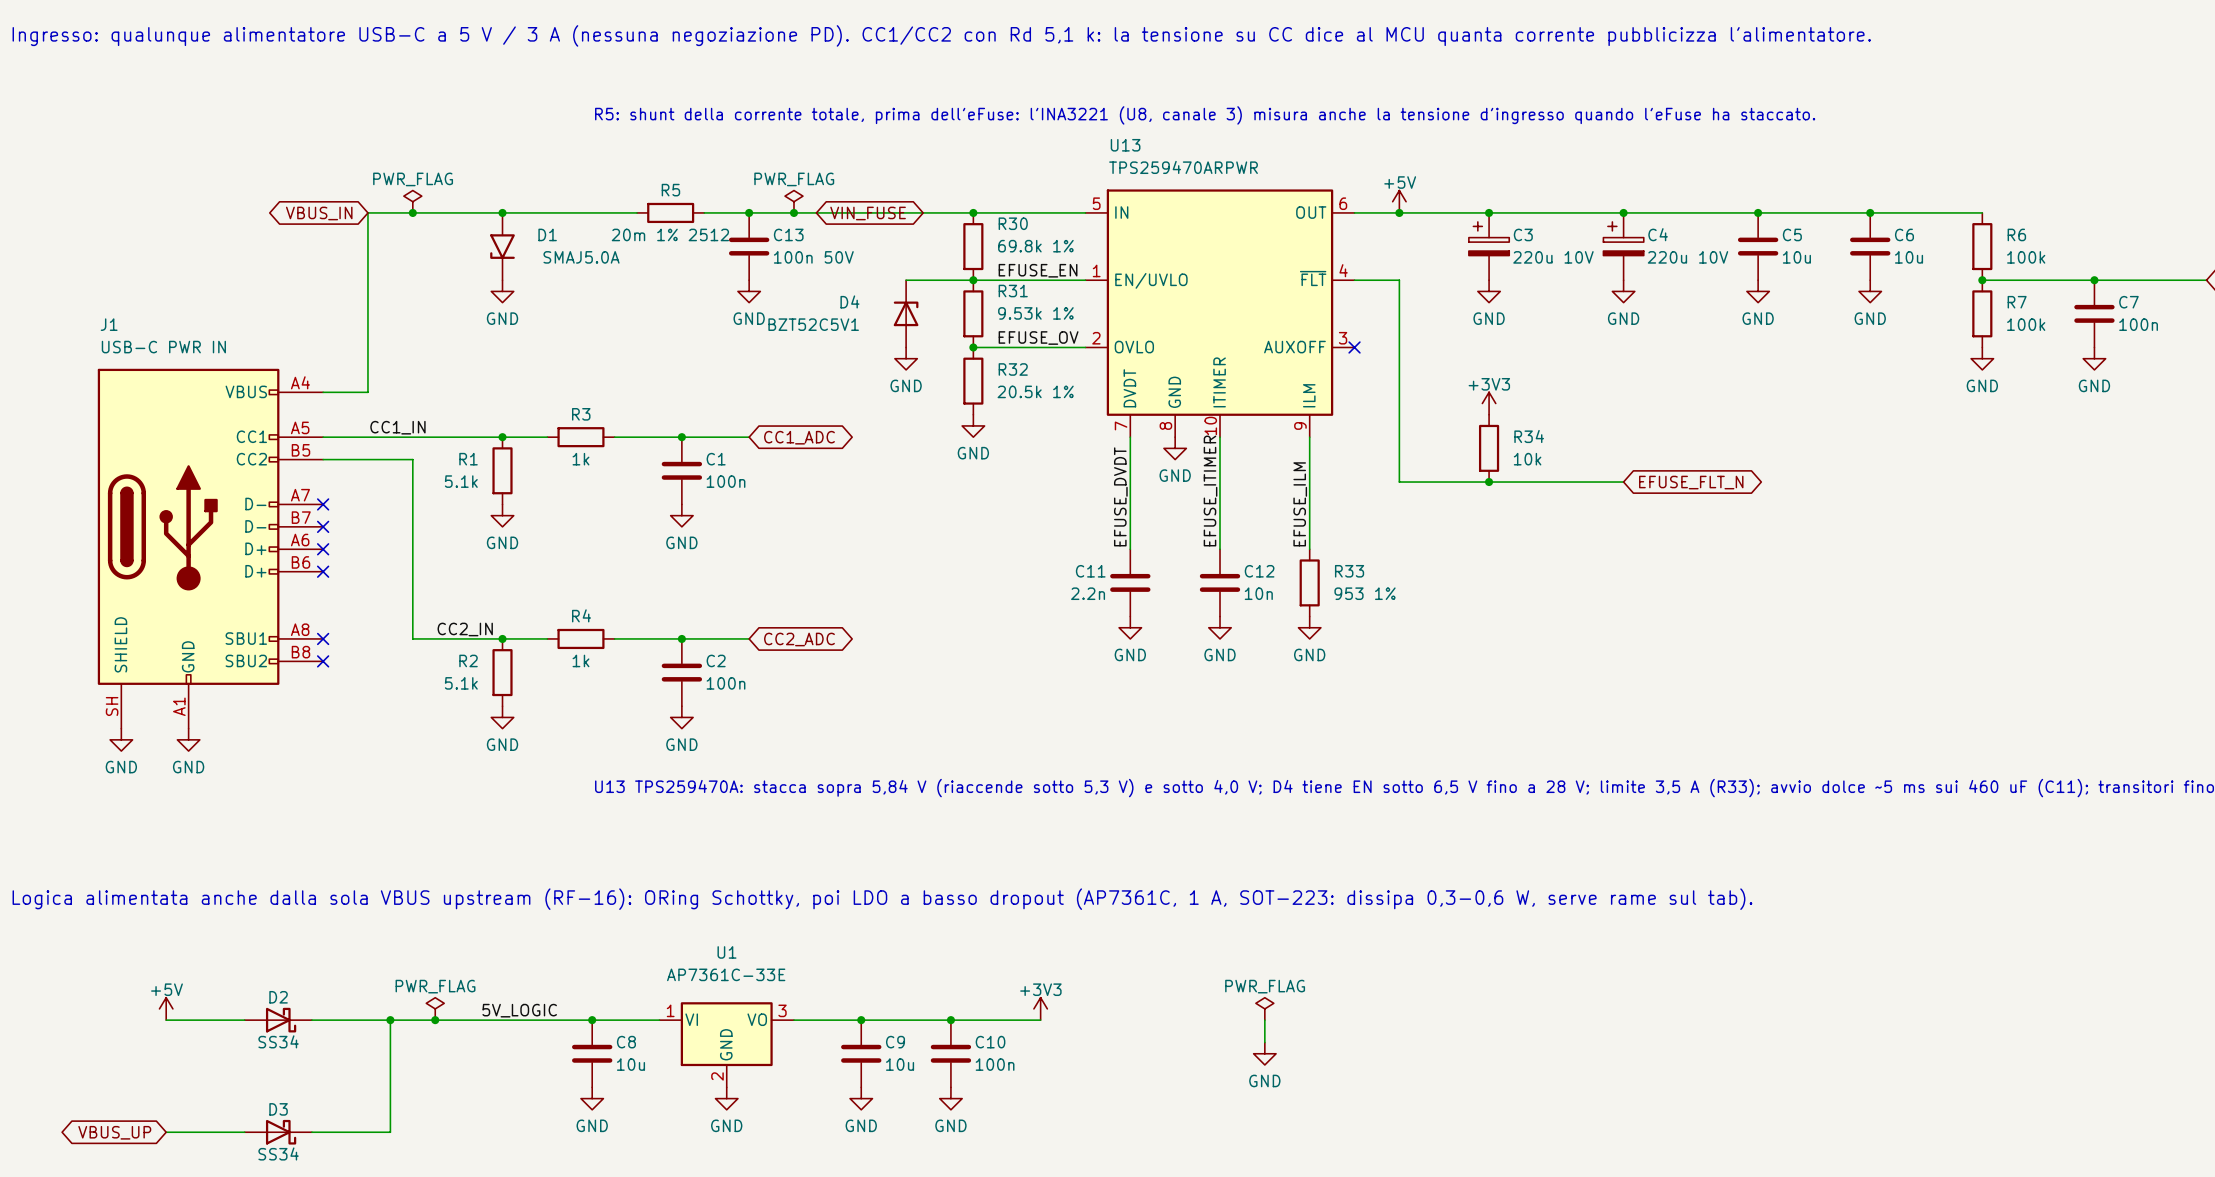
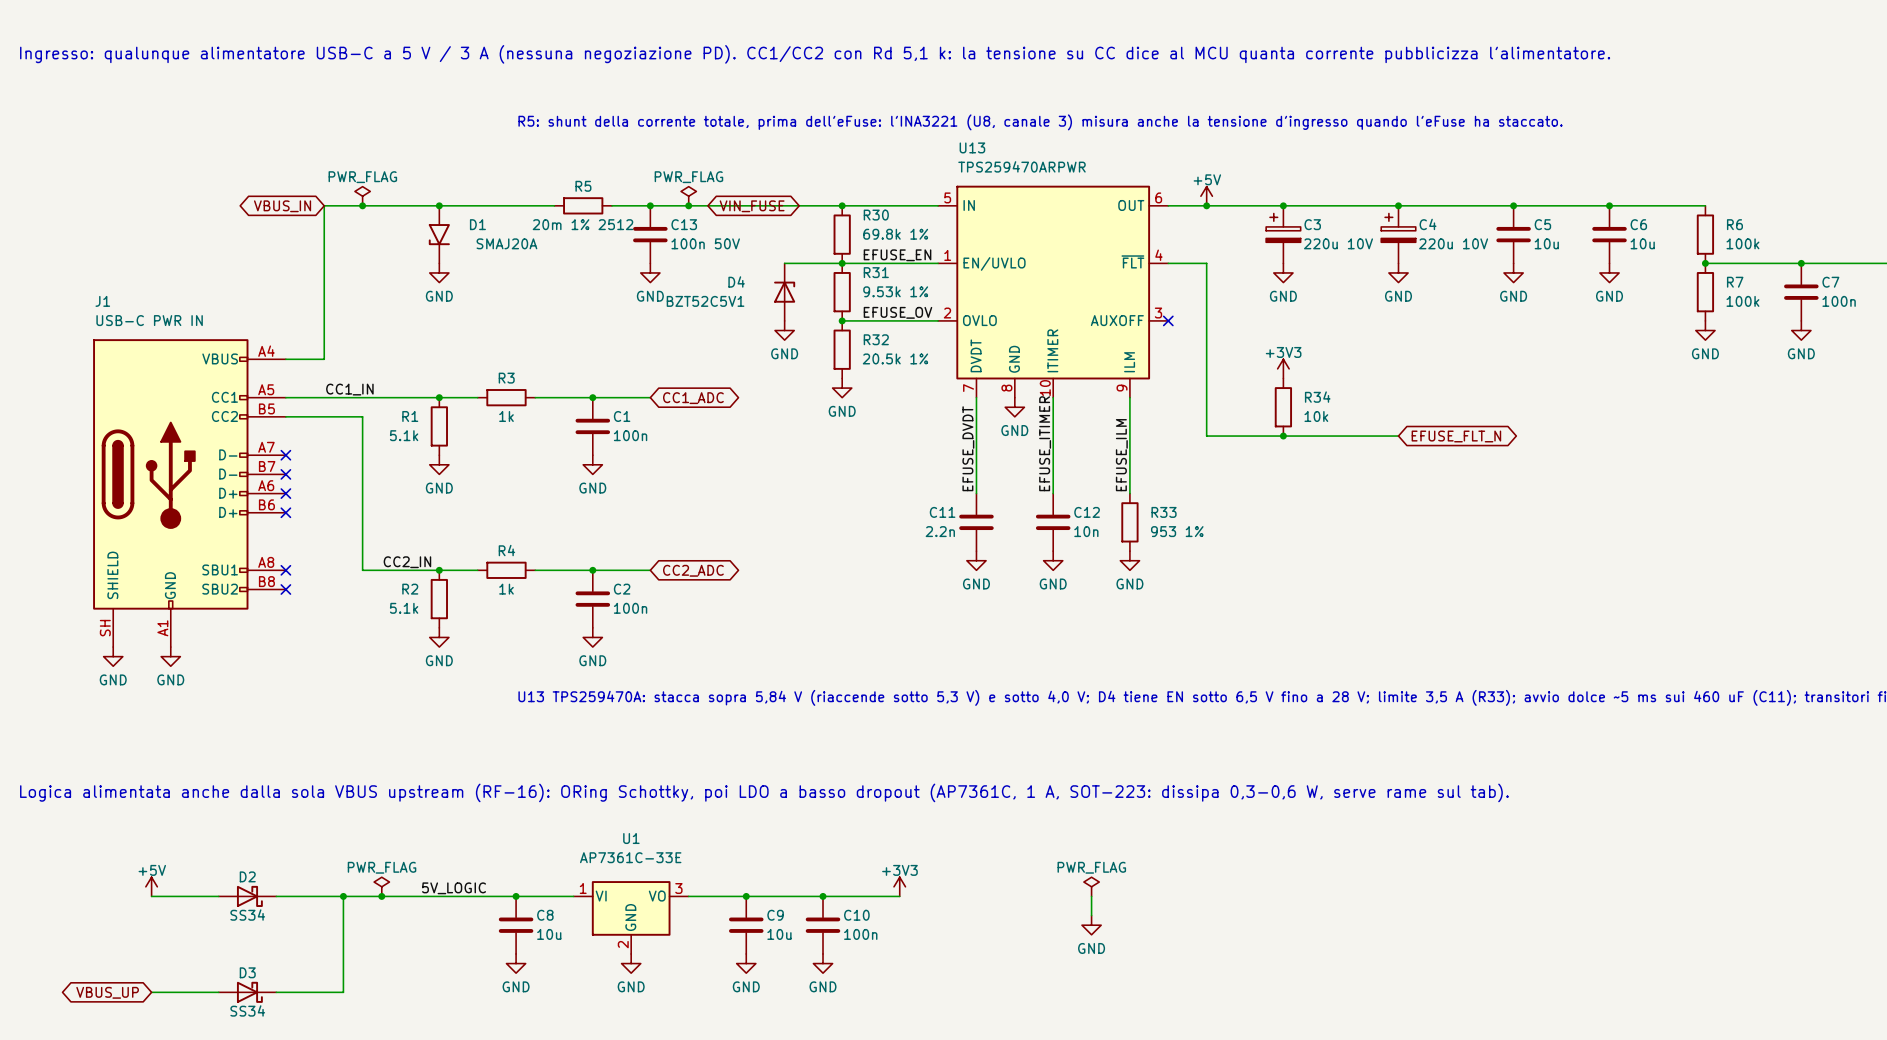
D1 value: SMAJ5.0A (581, 257) -> SMAJ20A (506, 243)

